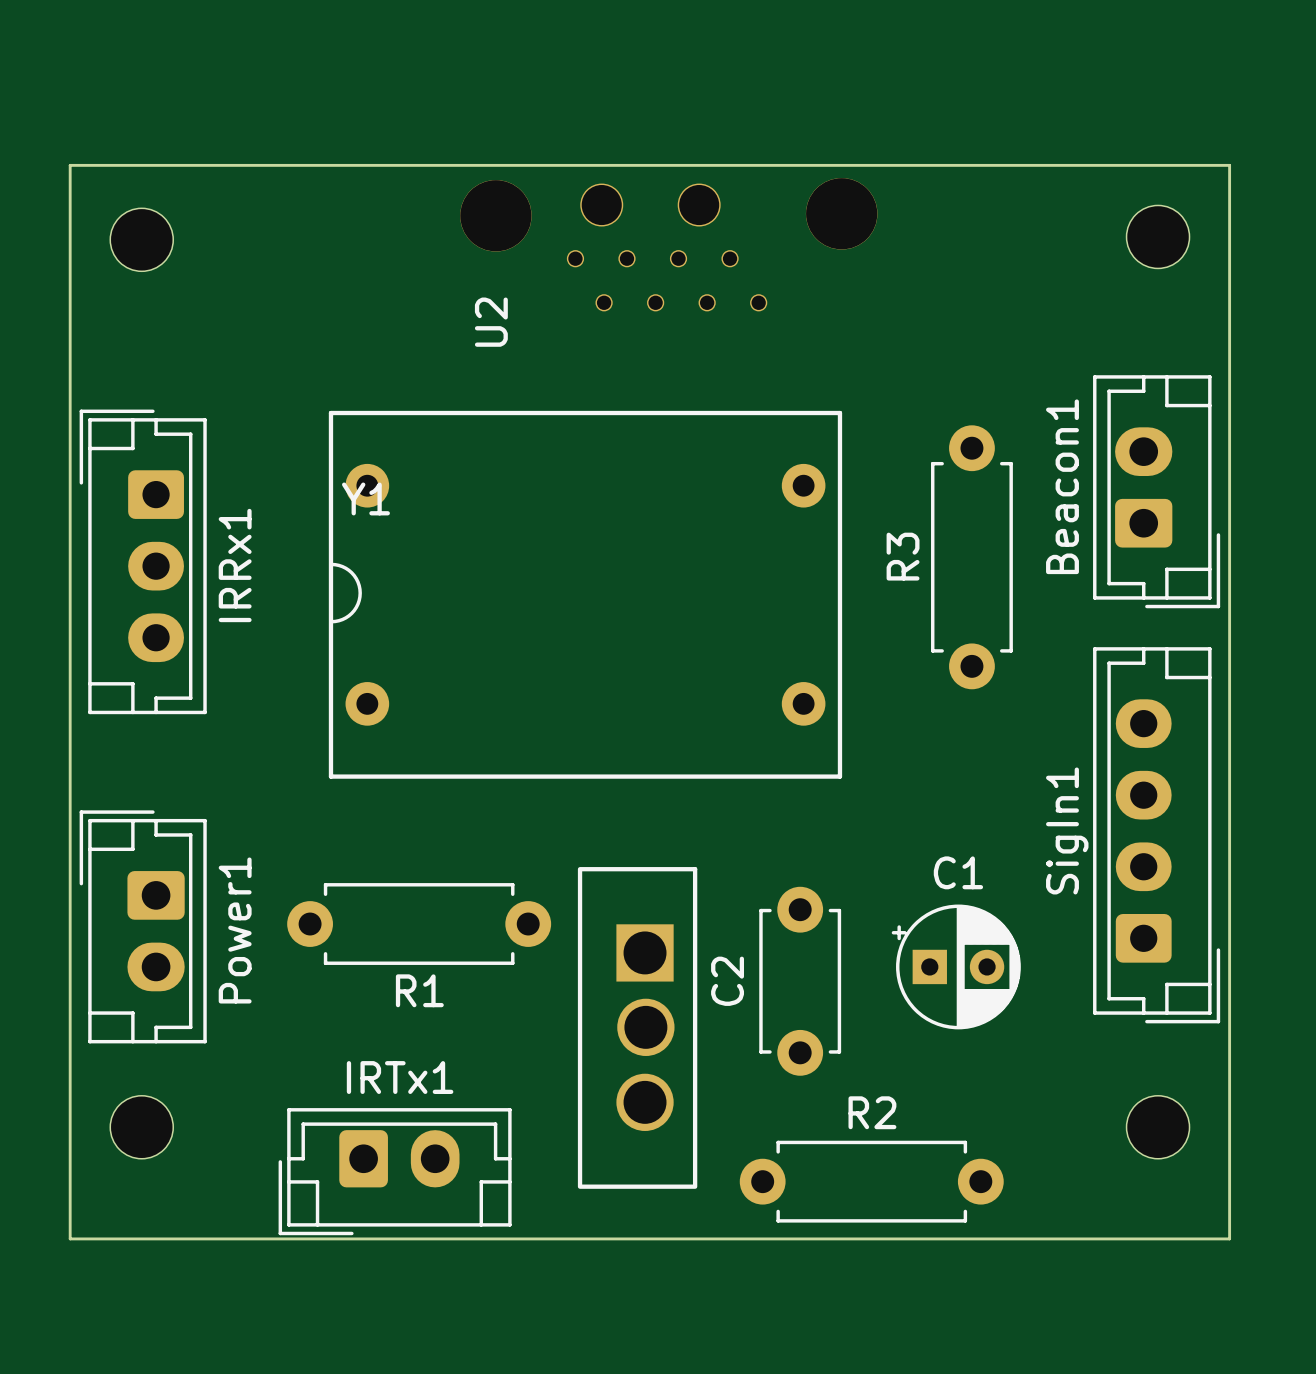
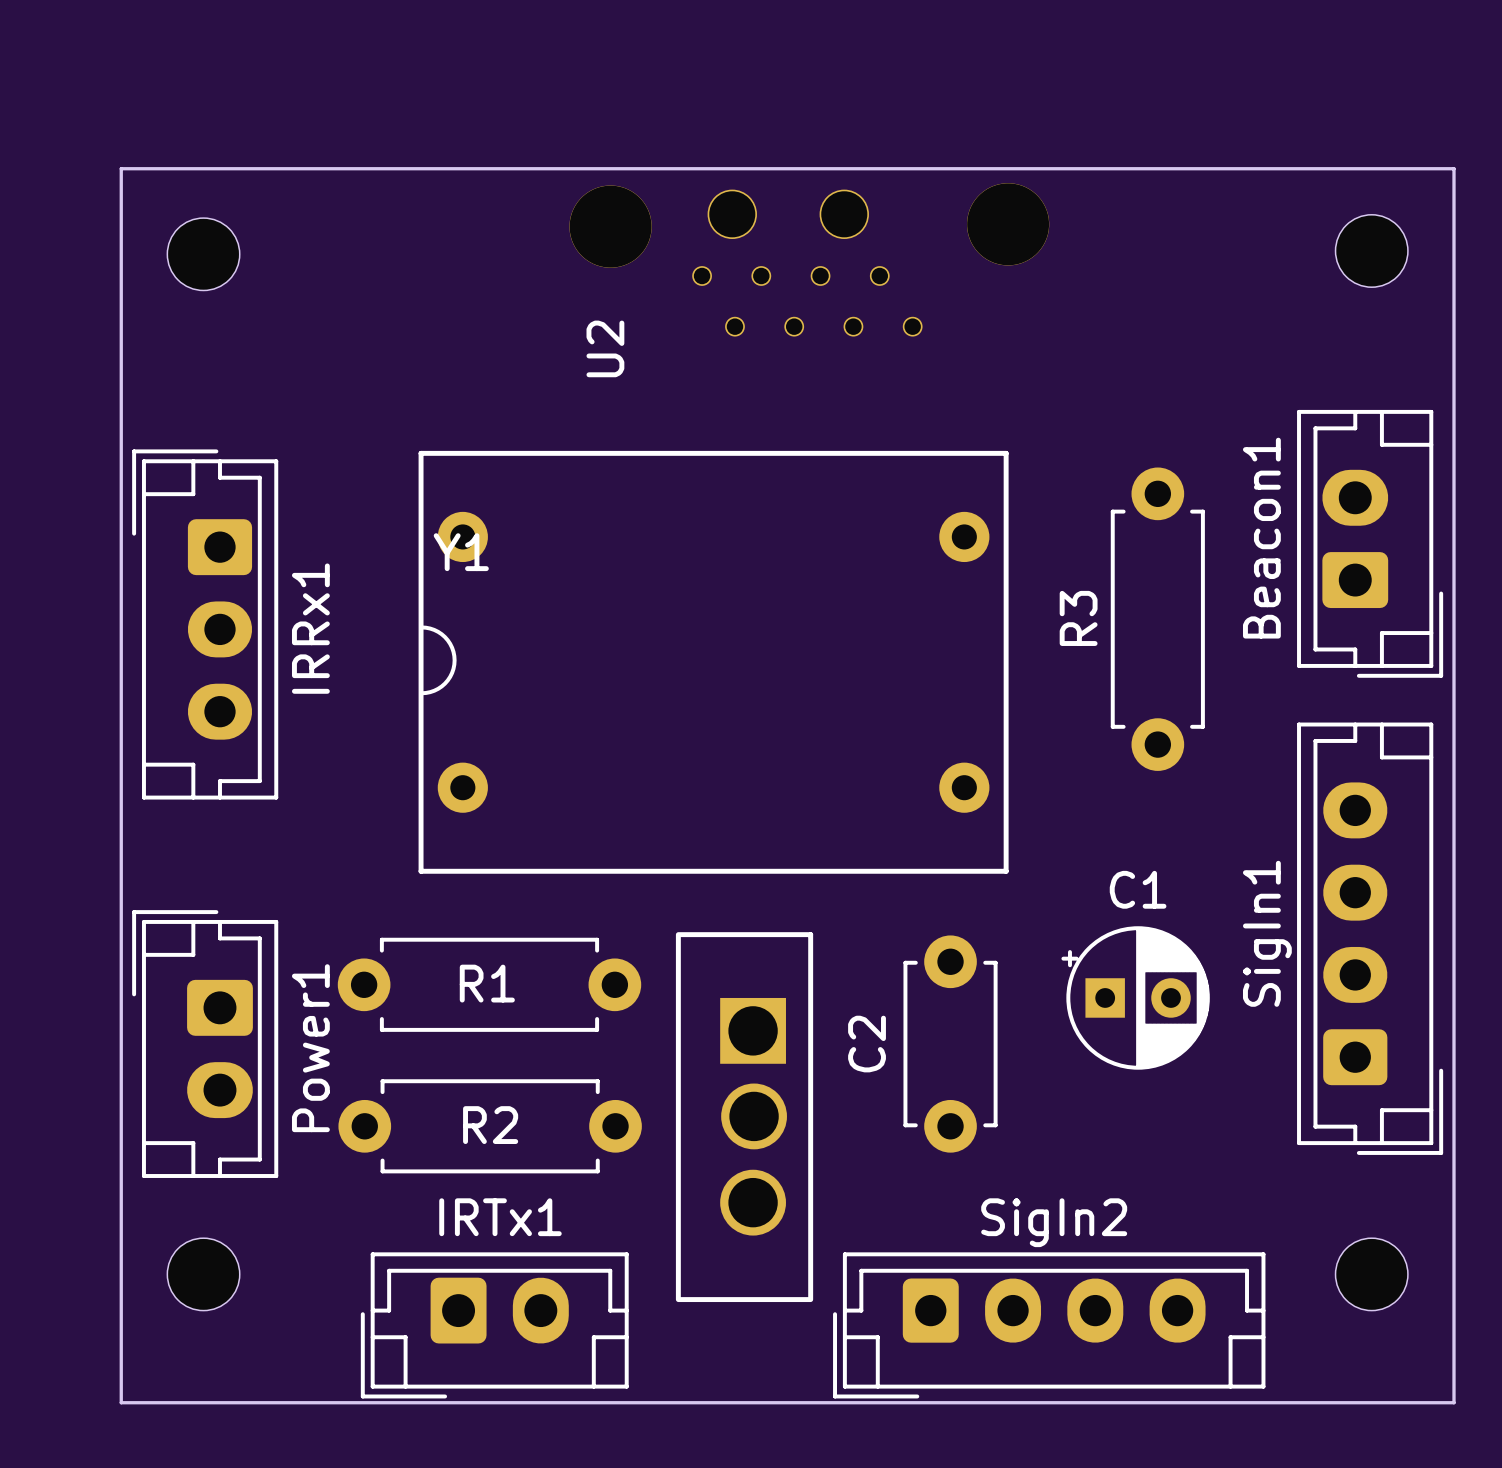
text: none -> R1 (487, 983)
part: none -> (489, 984)
R1: (419, 924) -> none
C1 position: (956, 966) -> (1135, 997)
C2 position: (800, 981) -> (950, 1044)
text: none -> R2 (490, 1125)
part: none -> (490, 1126)
part position: (637, 1027) -> (744, 1117)
SigIn2: none -> (1049, 1325)
R2: (871, 1181) -> none

